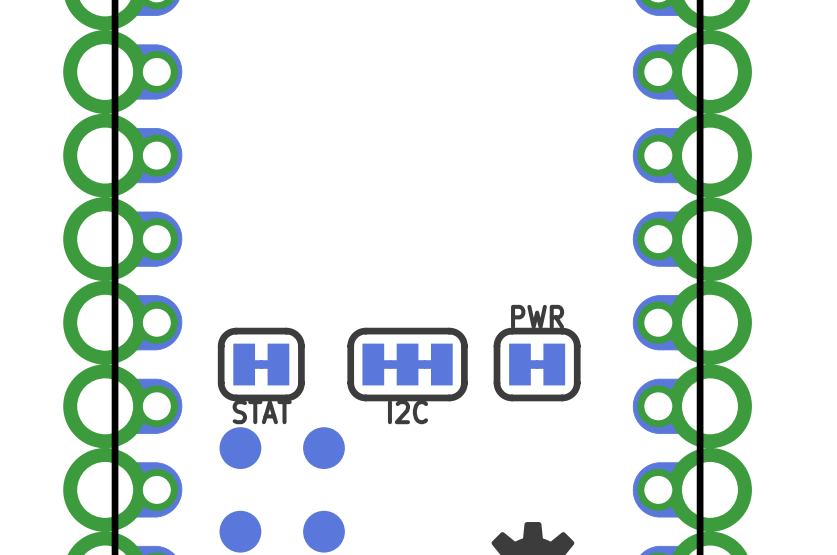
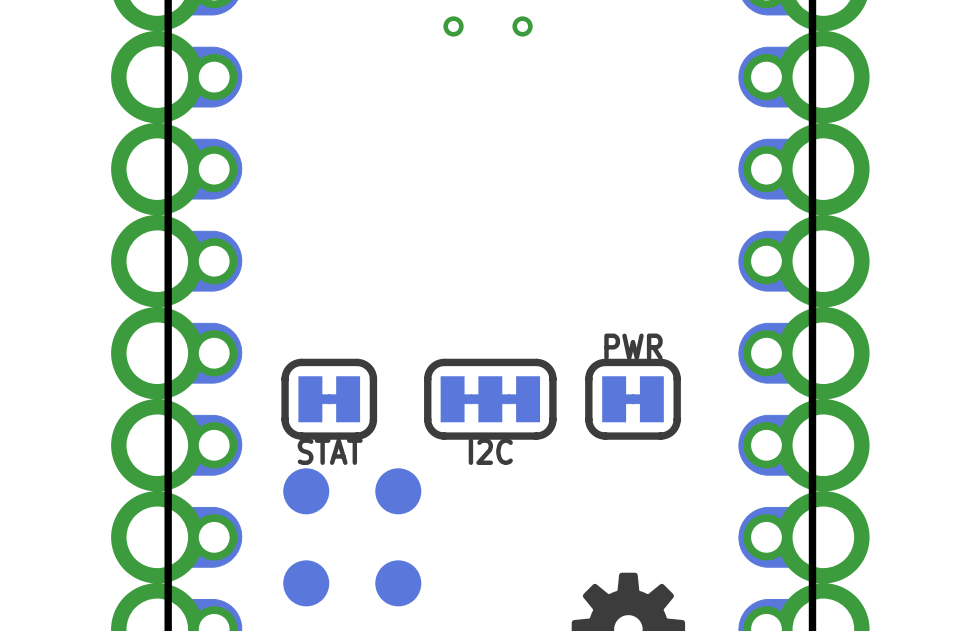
via: none -> (453, 26)
via: none -> (522, 26)

